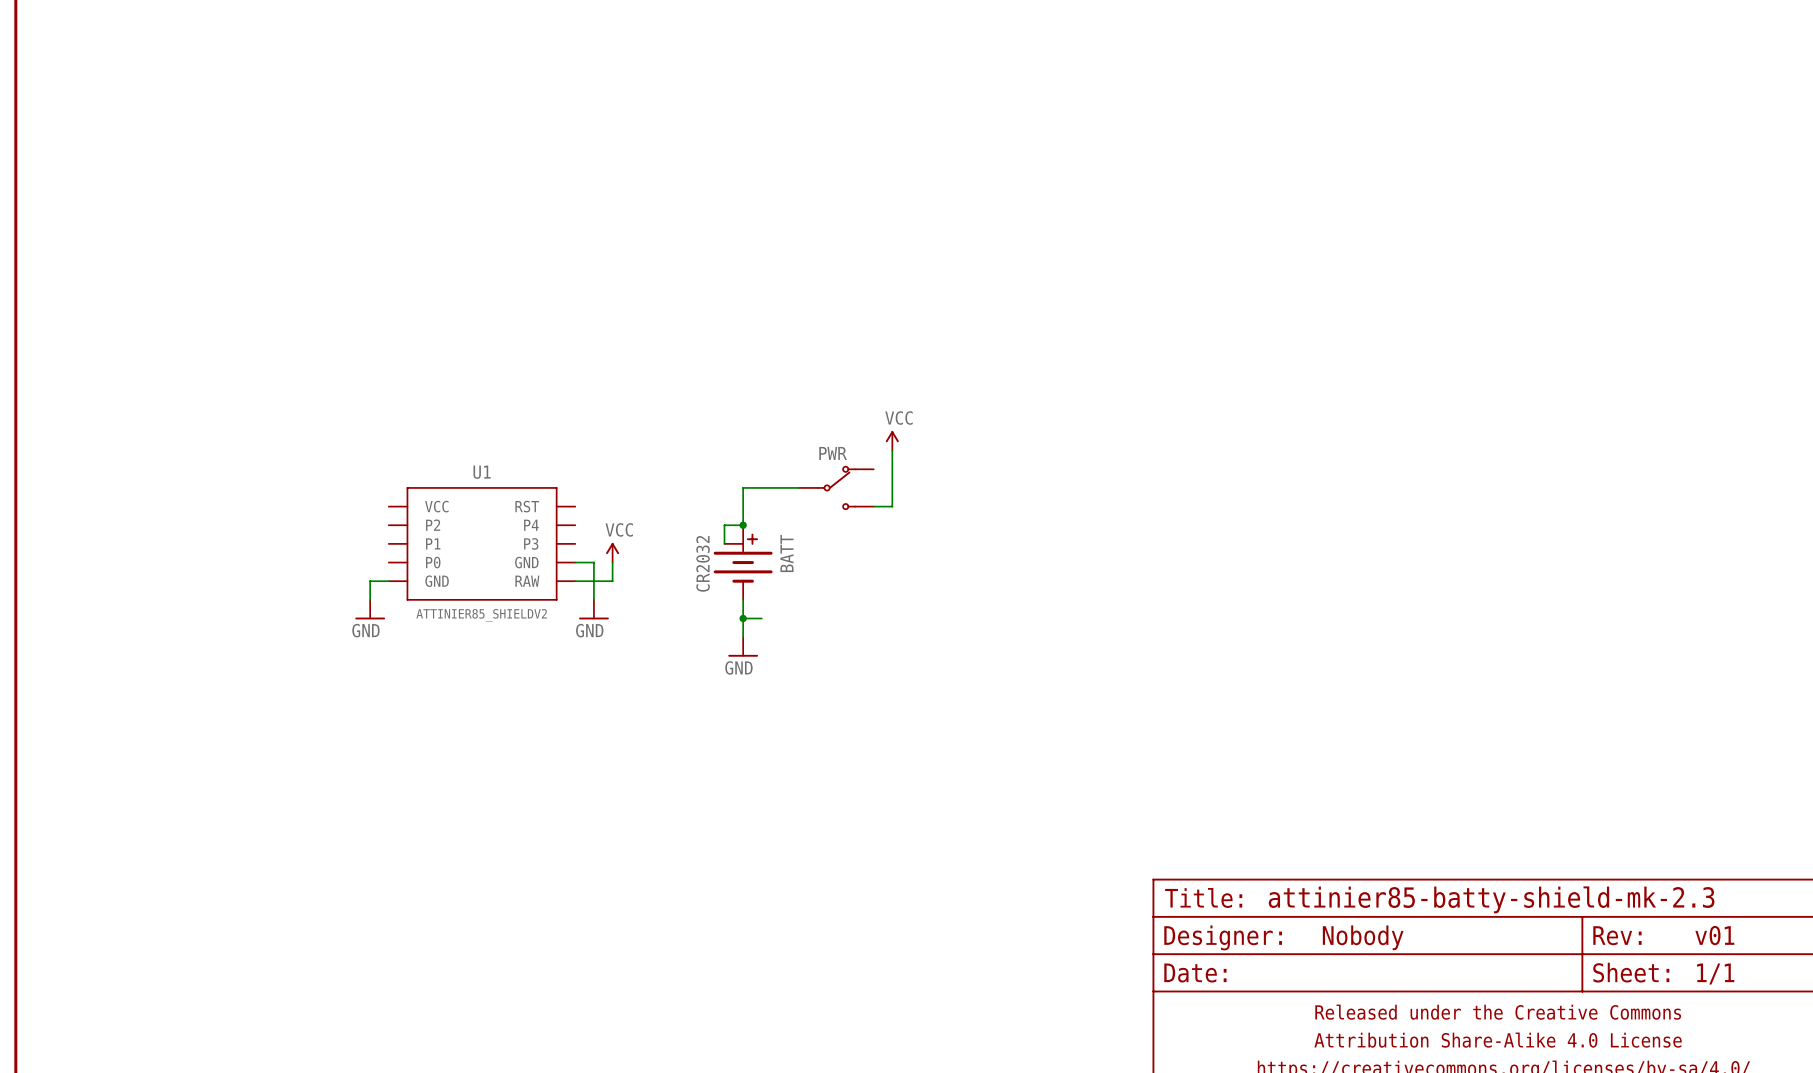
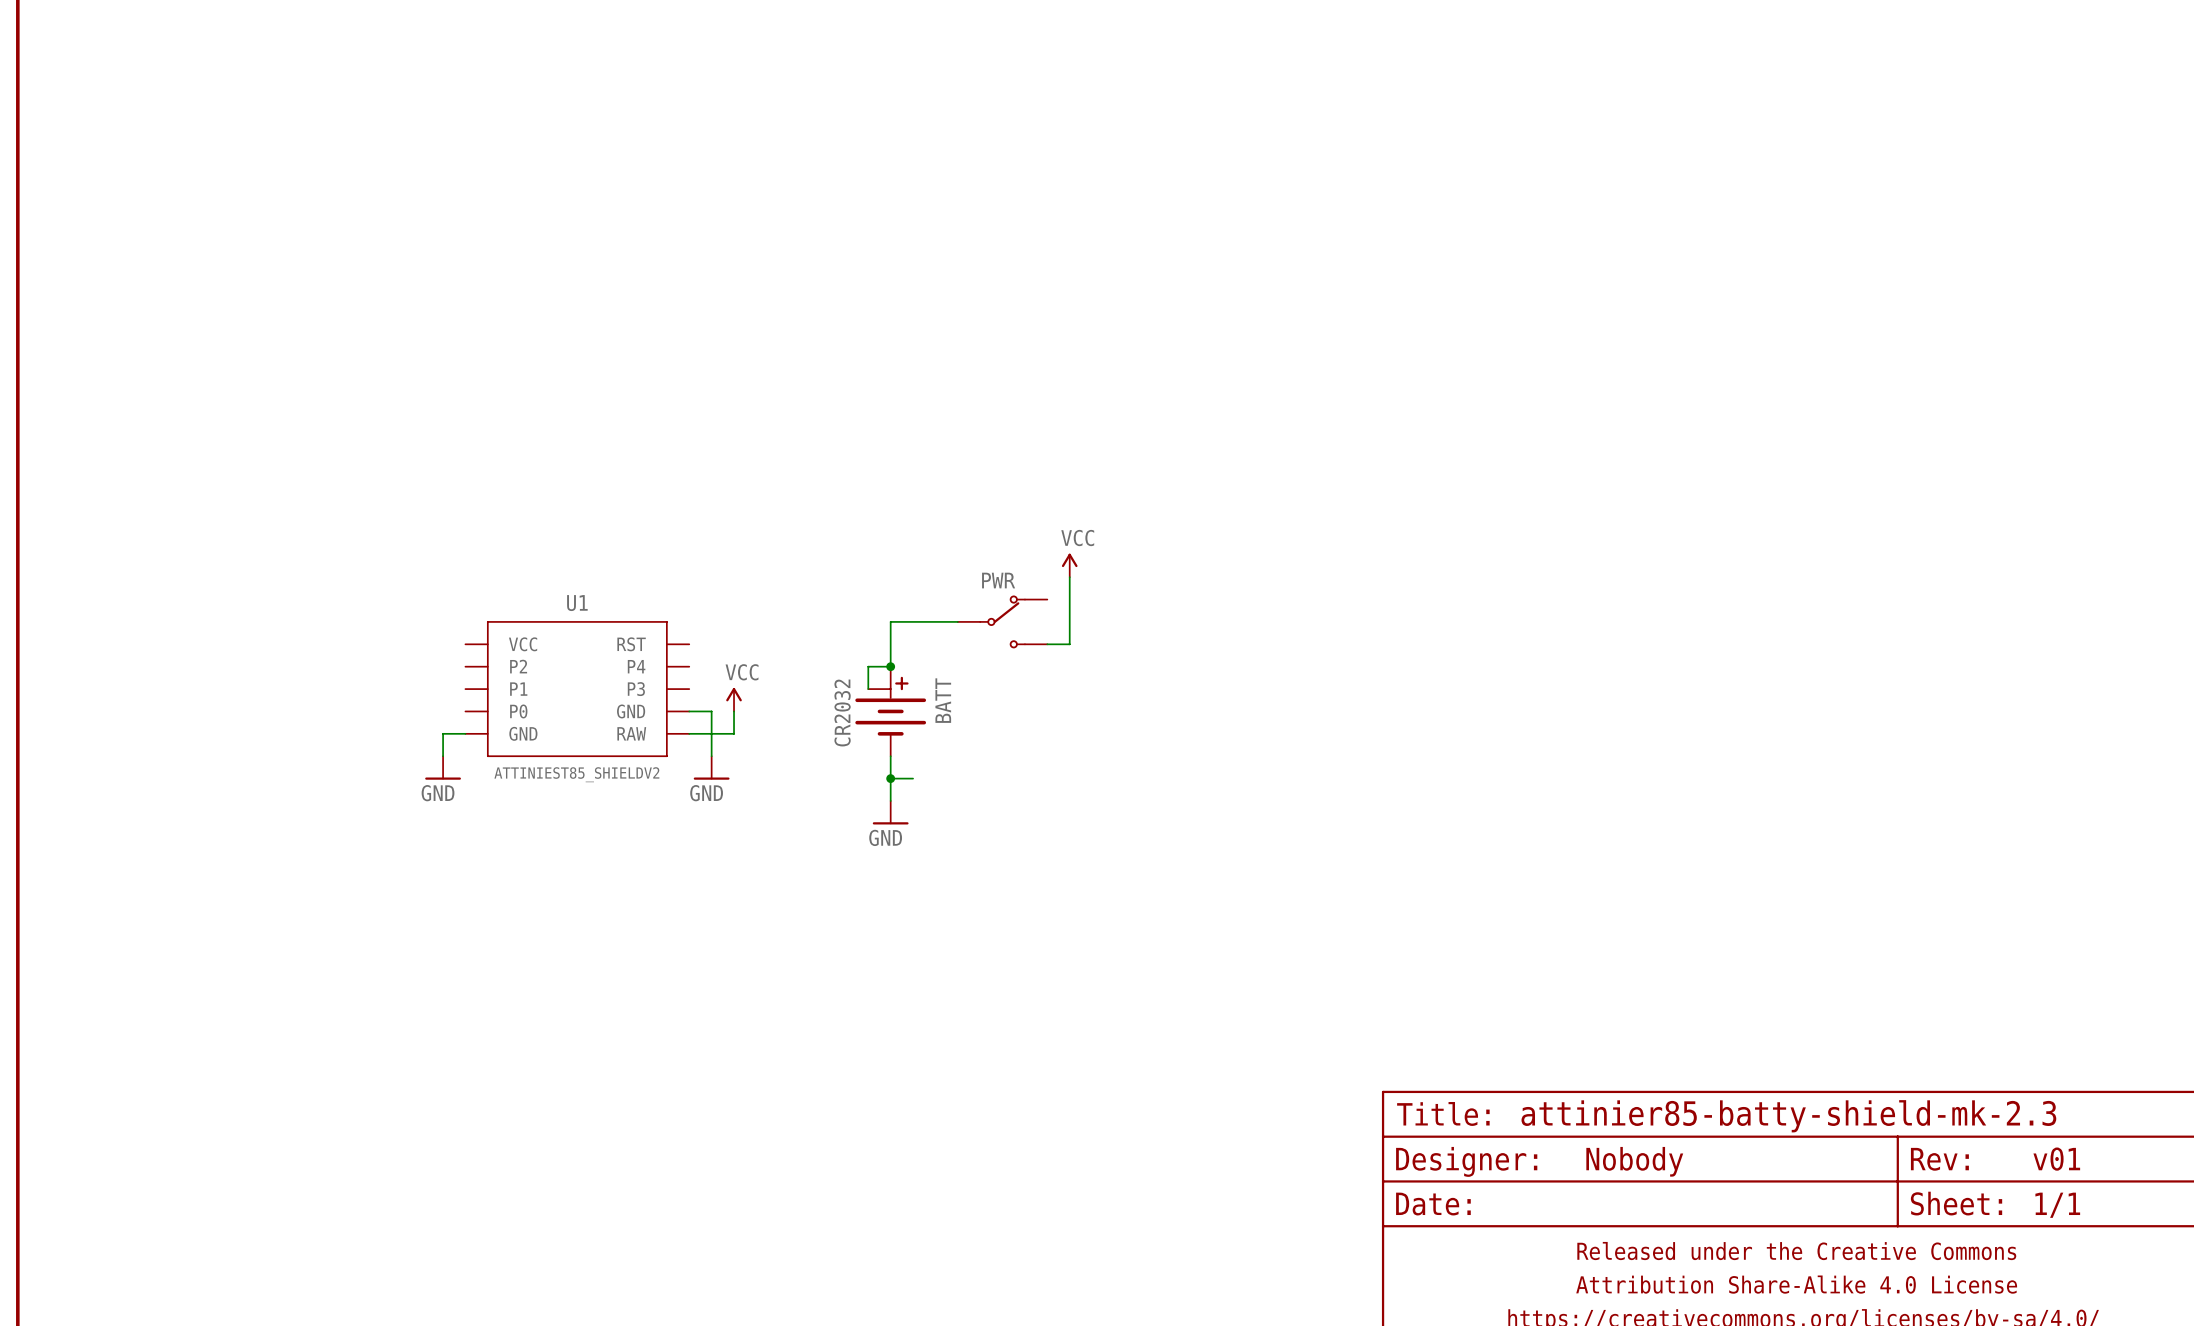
U1 value: ATTINIER85_SHIELDV2 (481, 615) -> ATTINIEST85_SHIELDV2 (576, 774)

